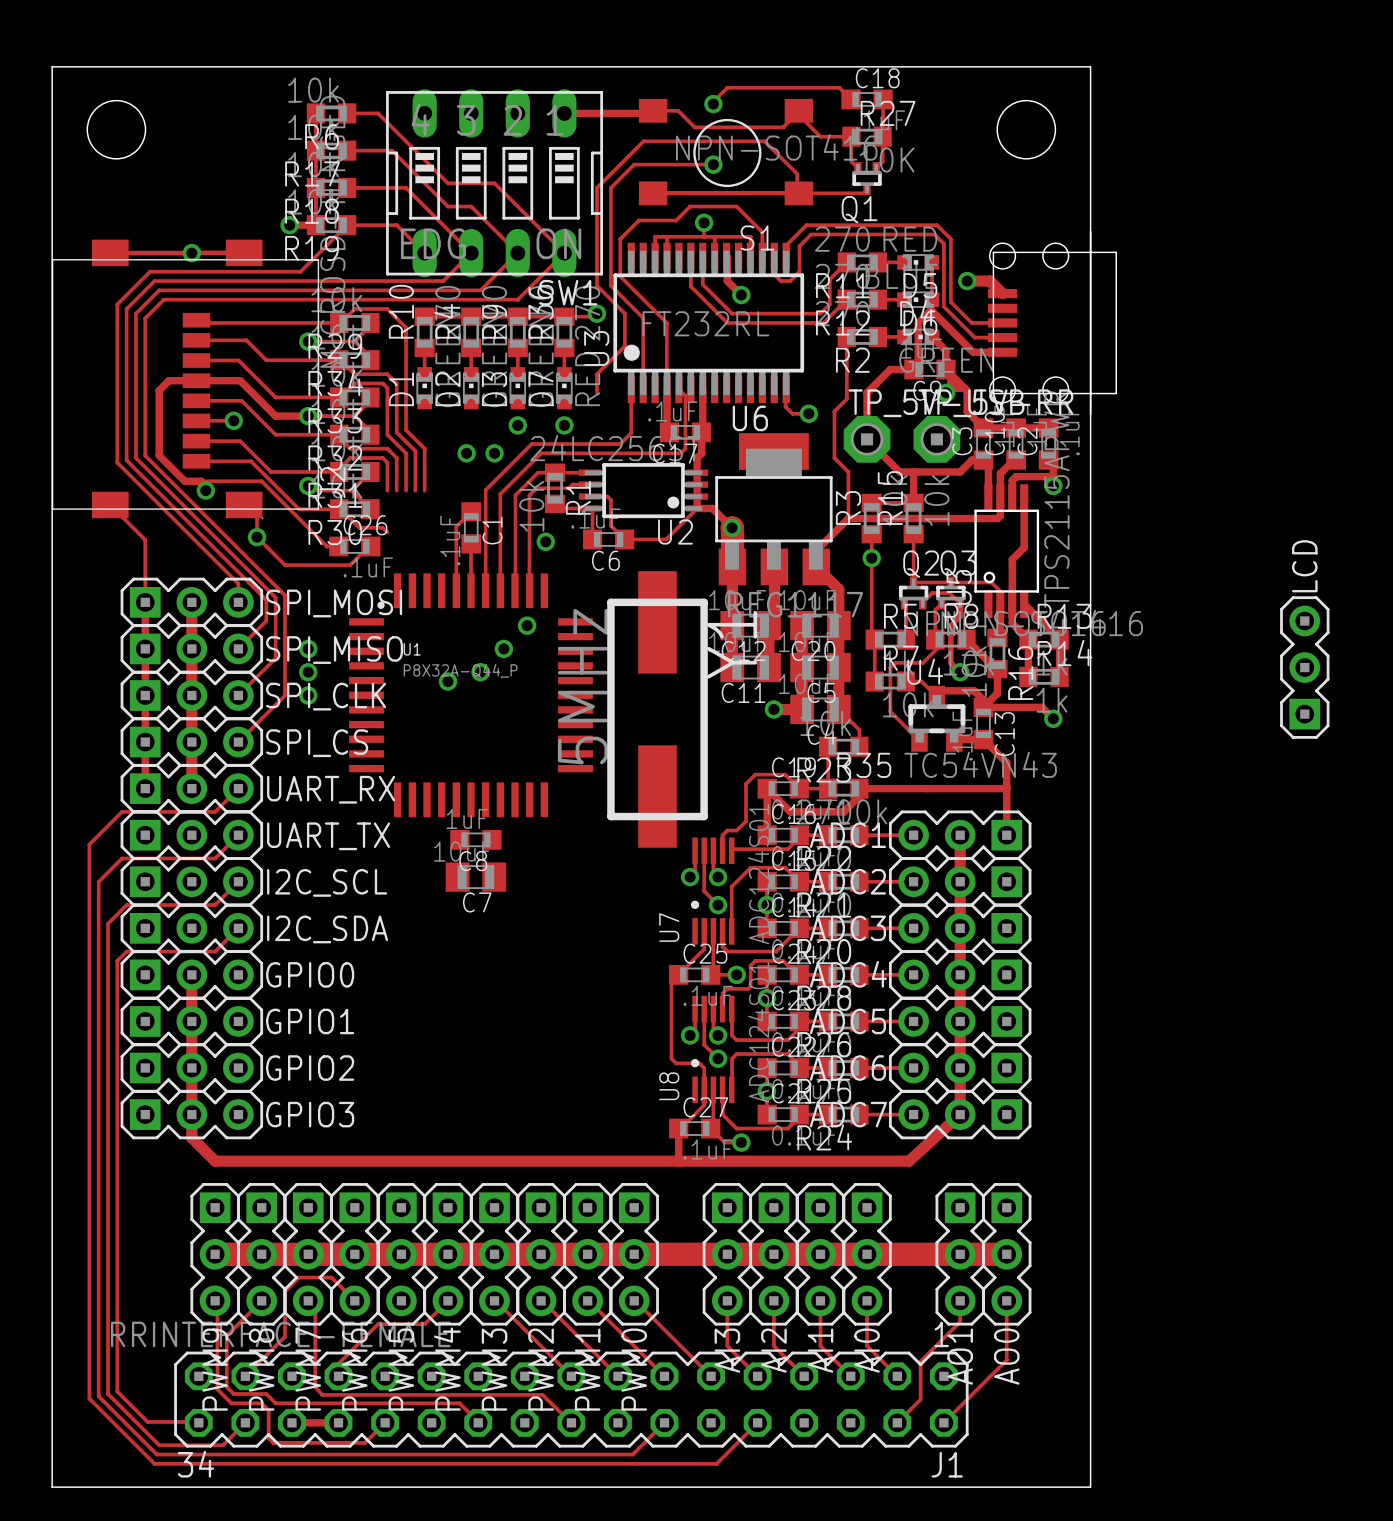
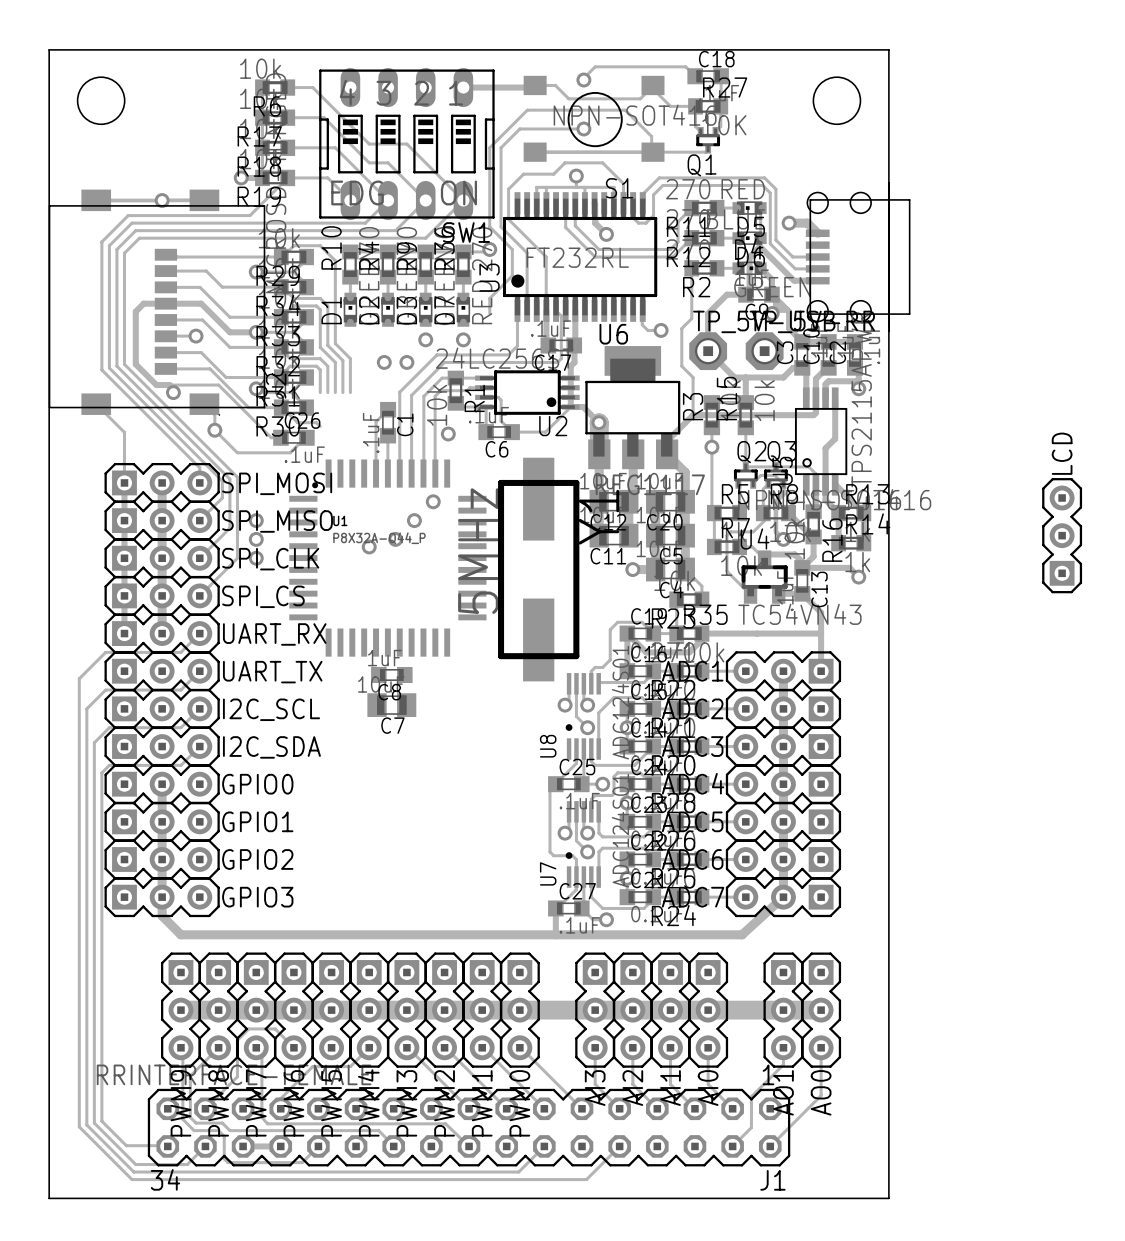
U7 name: U7 (669, 927) -> U8 (548, 746)
U8 name: U8 (669, 1086) -> U7 (548, 873)

